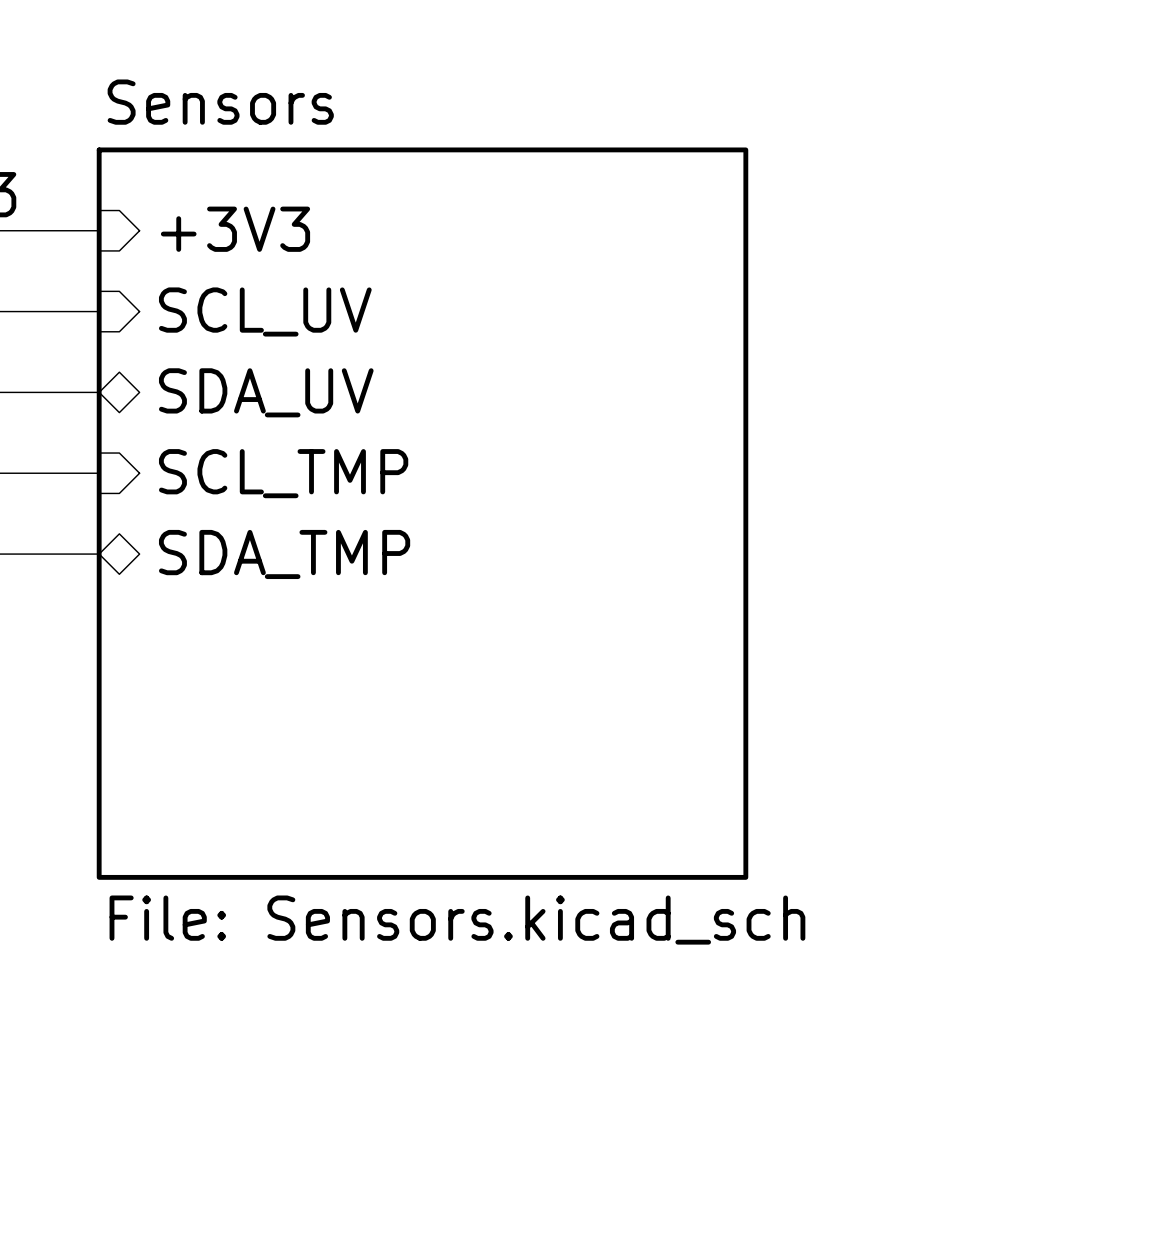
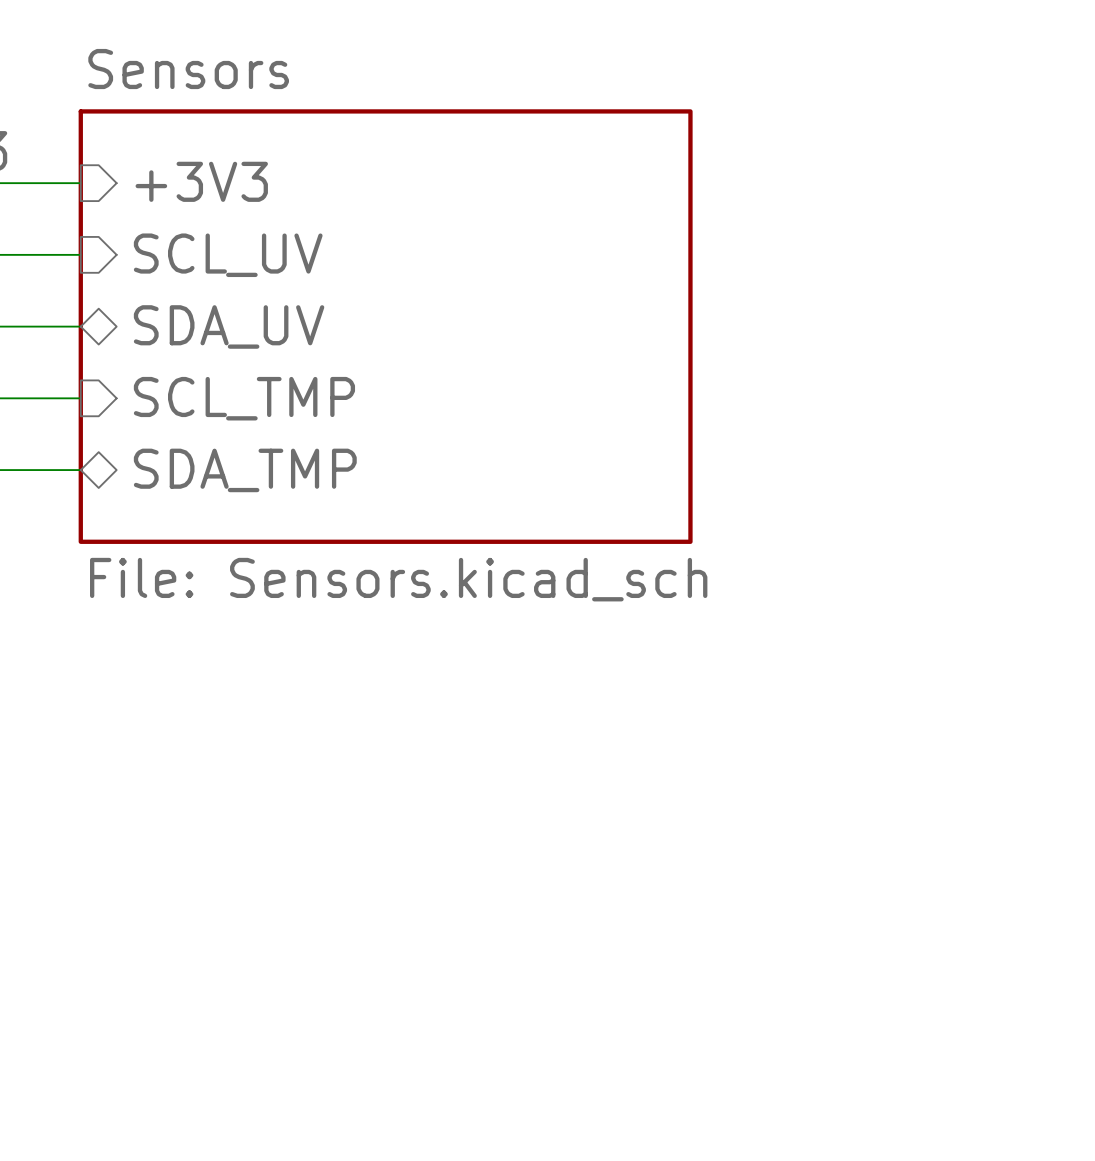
sheet Sensors: none -> File: Sensors.kicad_sch (385, 326)
sheet Sensors: File: Sensors.kicad_sch (422, 513) -> none

